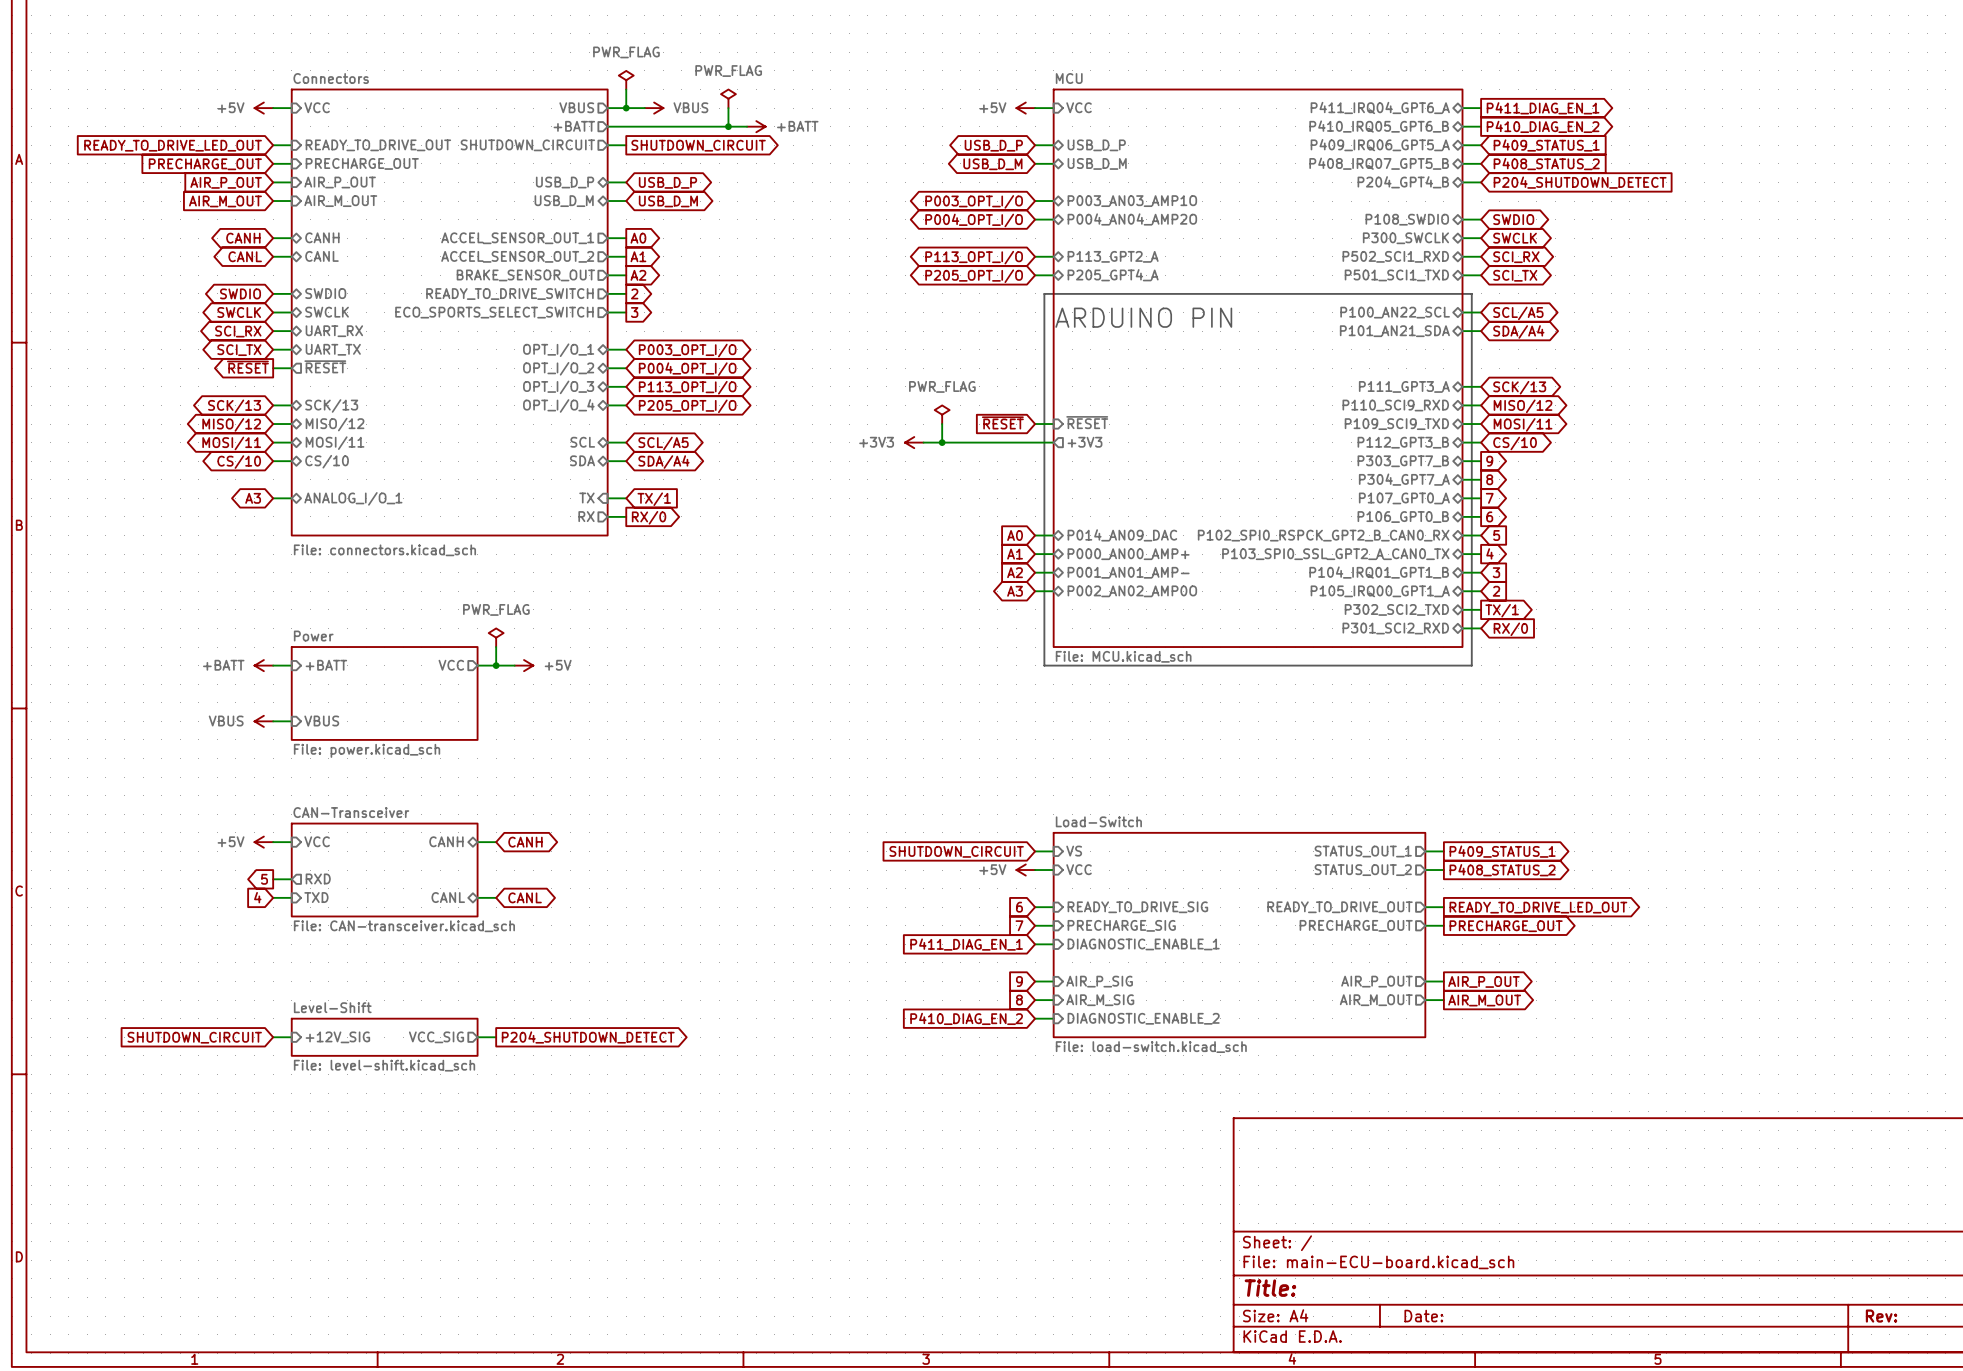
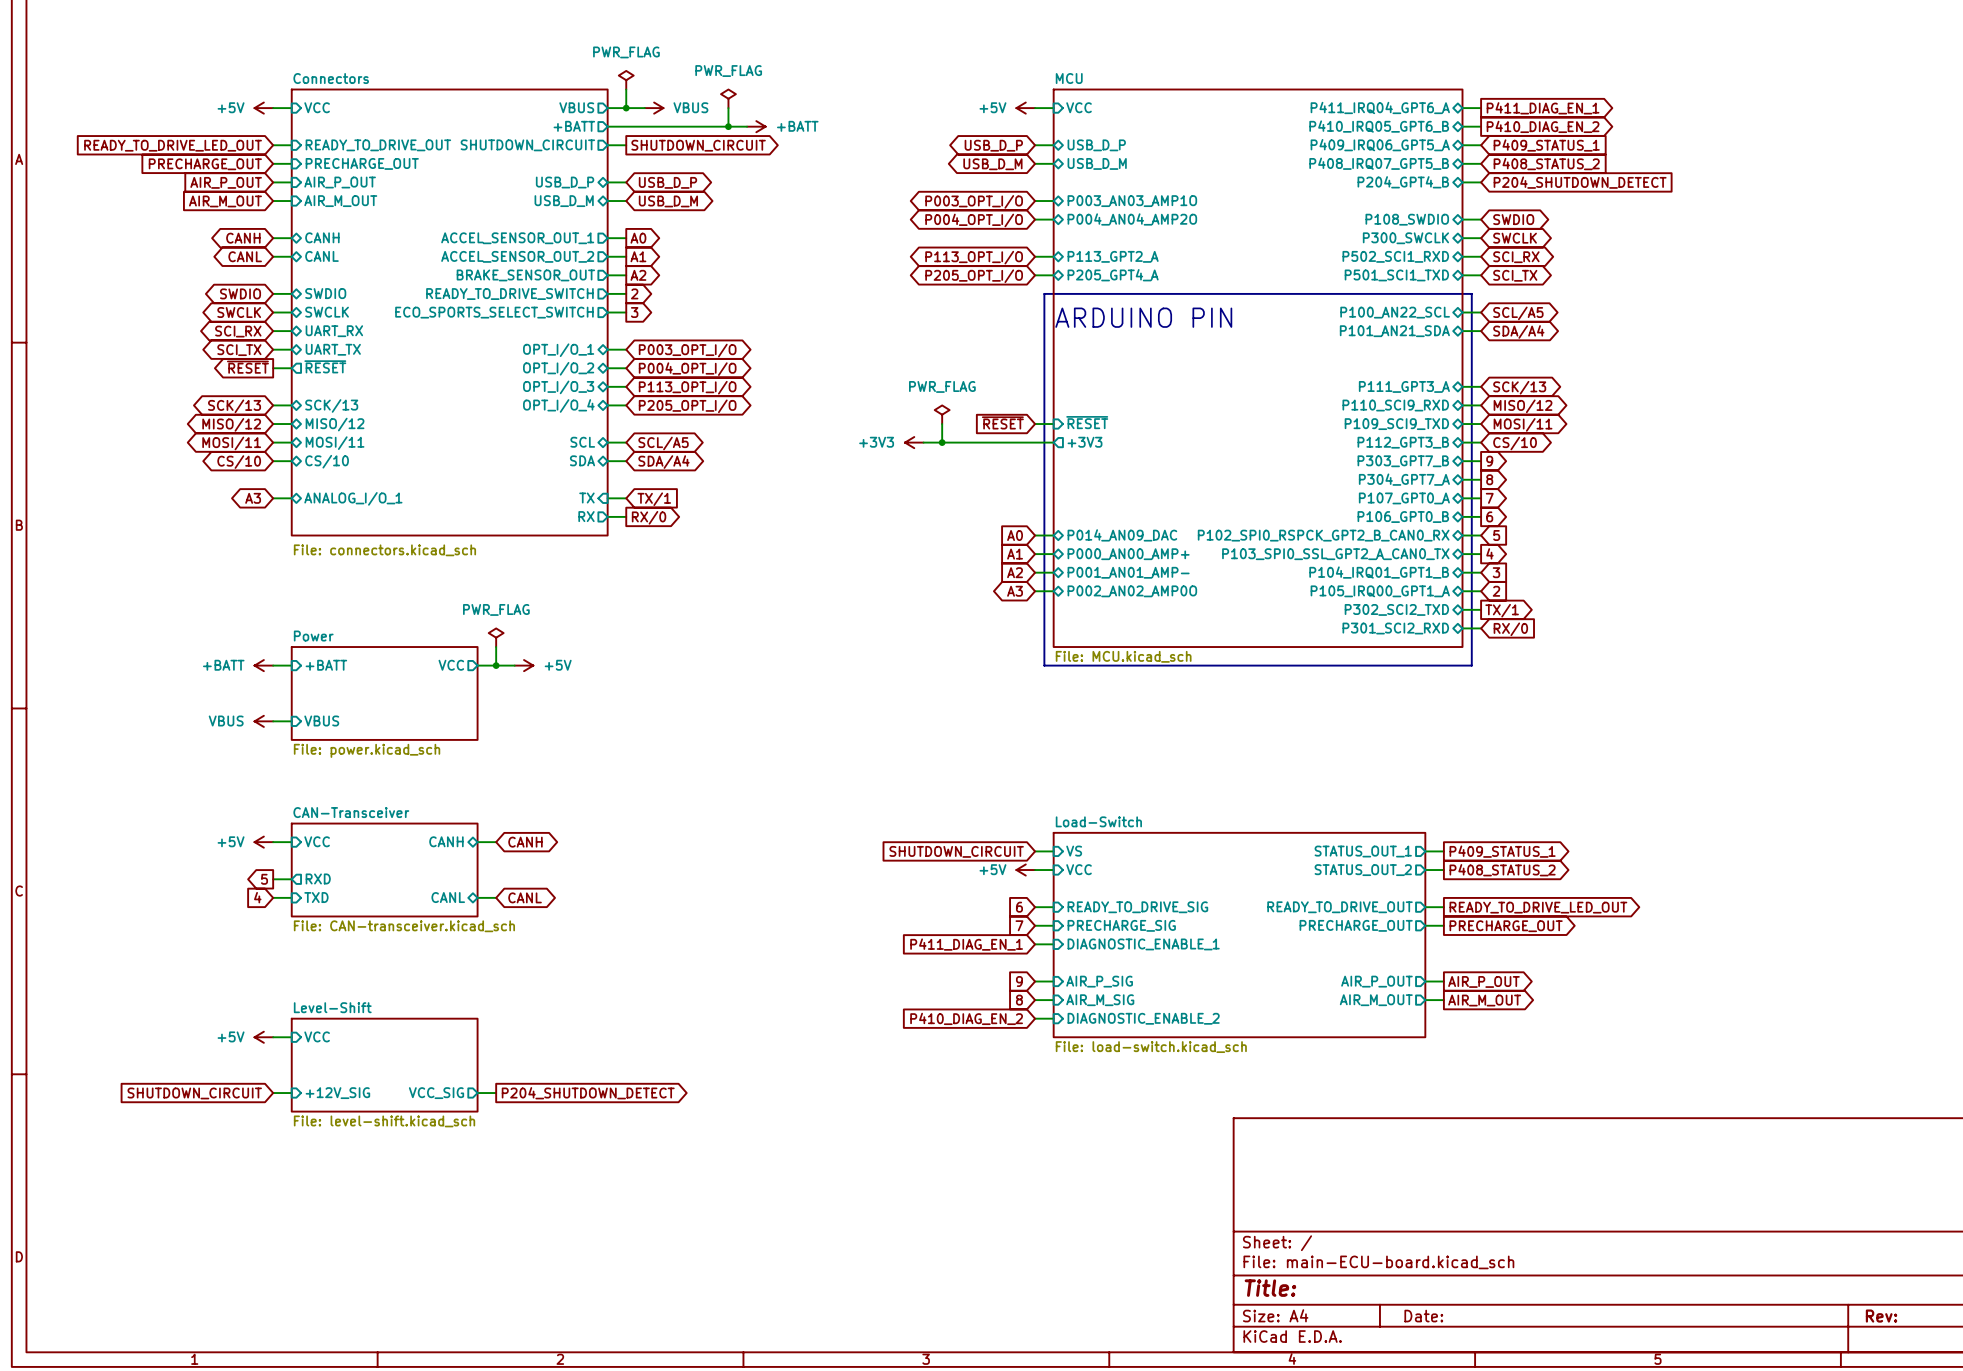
global label position: SHUTDOWN_CIRCUIT (194, 1037) -> SHUTDOWN_CIRCUIT (194, 1093)
power symbol: none -> +5V (263, 1037)
sheet pin: +12V_SIG (337, 1037) -> VCC (317, 1036)
sheet Level-Shift: File: level-shift.kicad_sch (384, 1037) -> none
sheet pin position: VCC_SIG (436, 1037) -> VCC_SIG (436, 1093)
wire: (477, 1037) (496, 1037) -> (477, 1093) (496, 1093)
global label position: P204_SHUTDOWN_DETECT (588, 1037) -> P204_SHUTDOWN_DETECT (588, 1093)
sheet Level-Shift: none -> File: level-shift.kicad_sch (384, 1065)
wire: none -> (273, 1093) (291, 1093)
sheet pin: none -> +12V_SIG (337, 1093)

